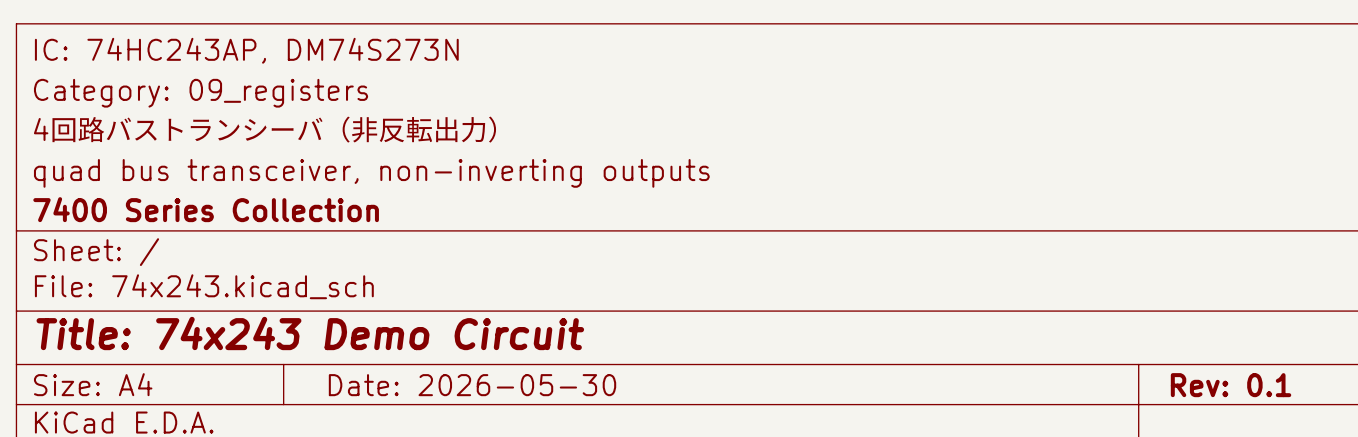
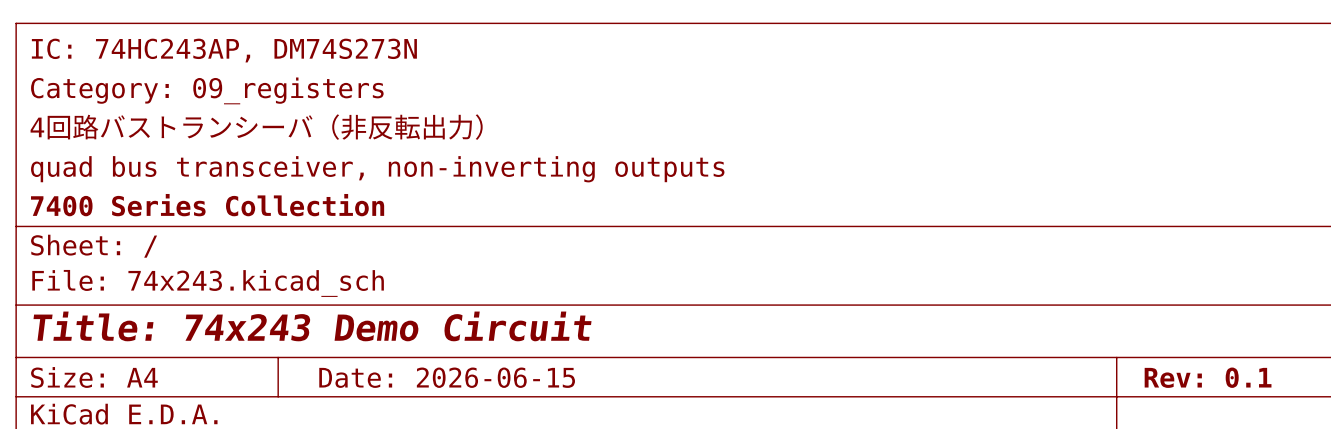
title block: Date: 2026-05-30 (472, 385) -> Date: 2026-06-15 (447, 377)

